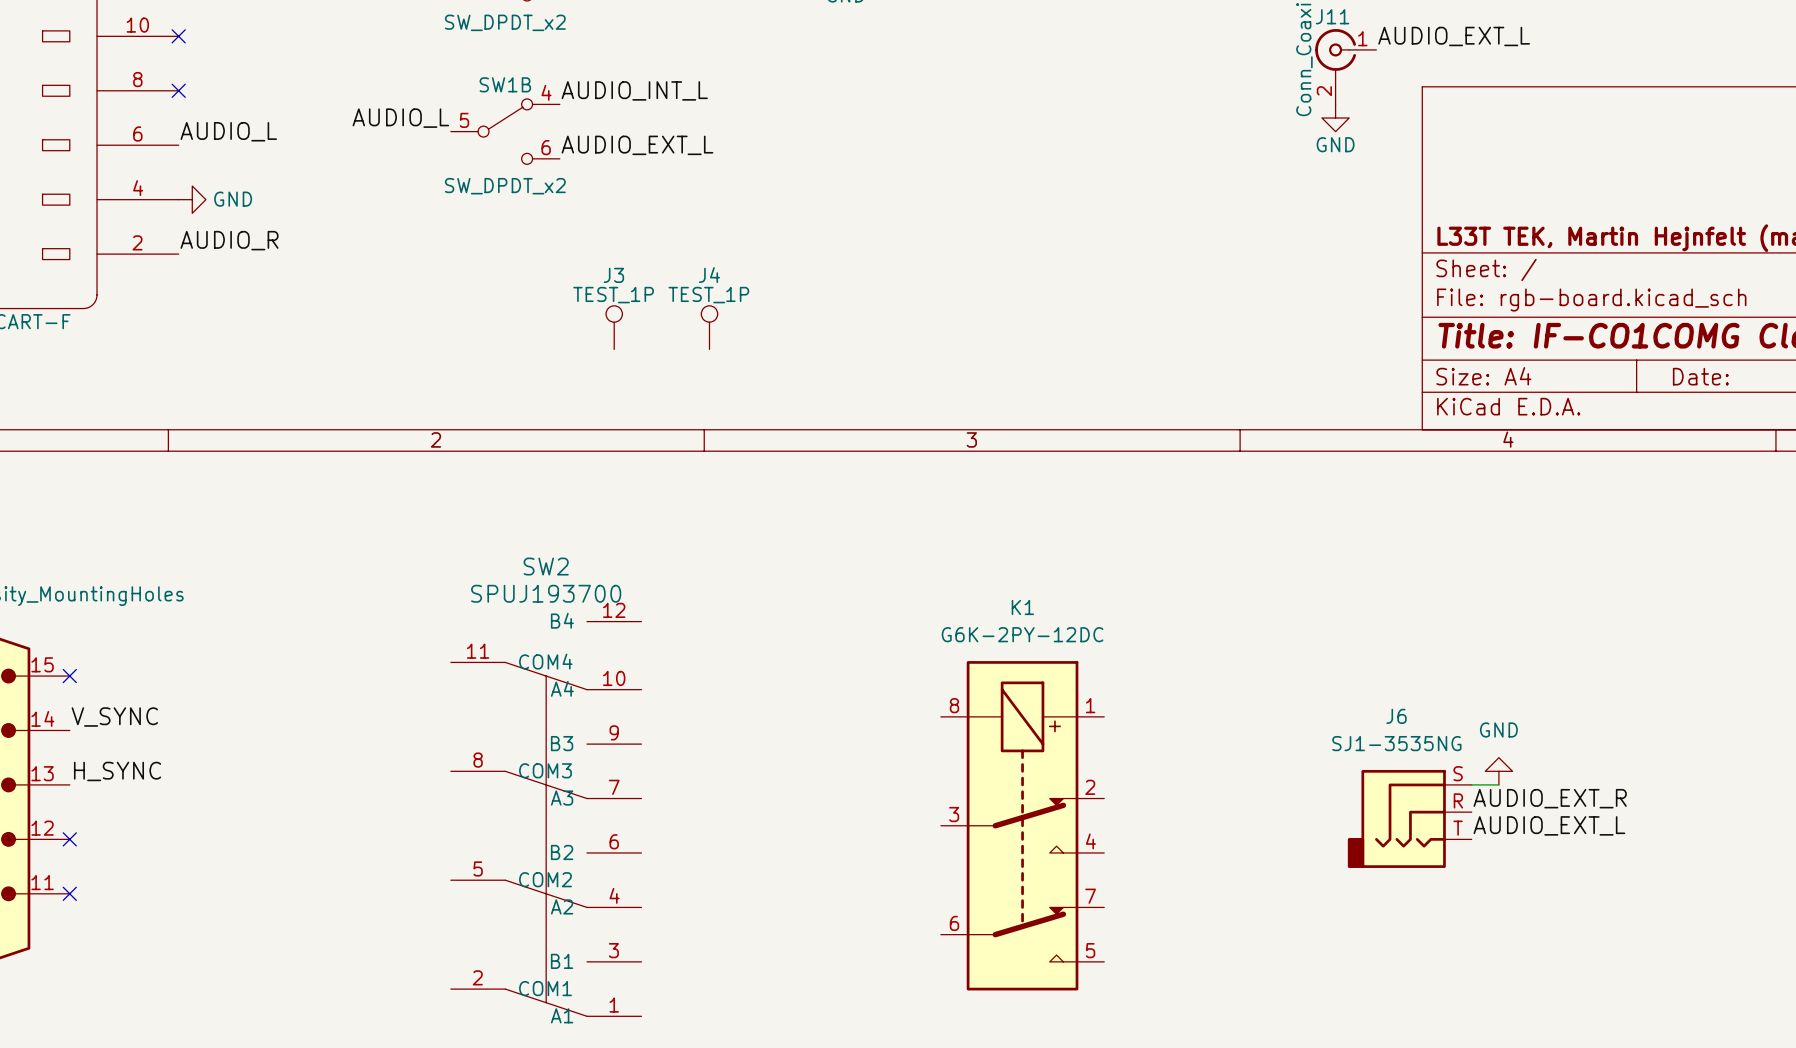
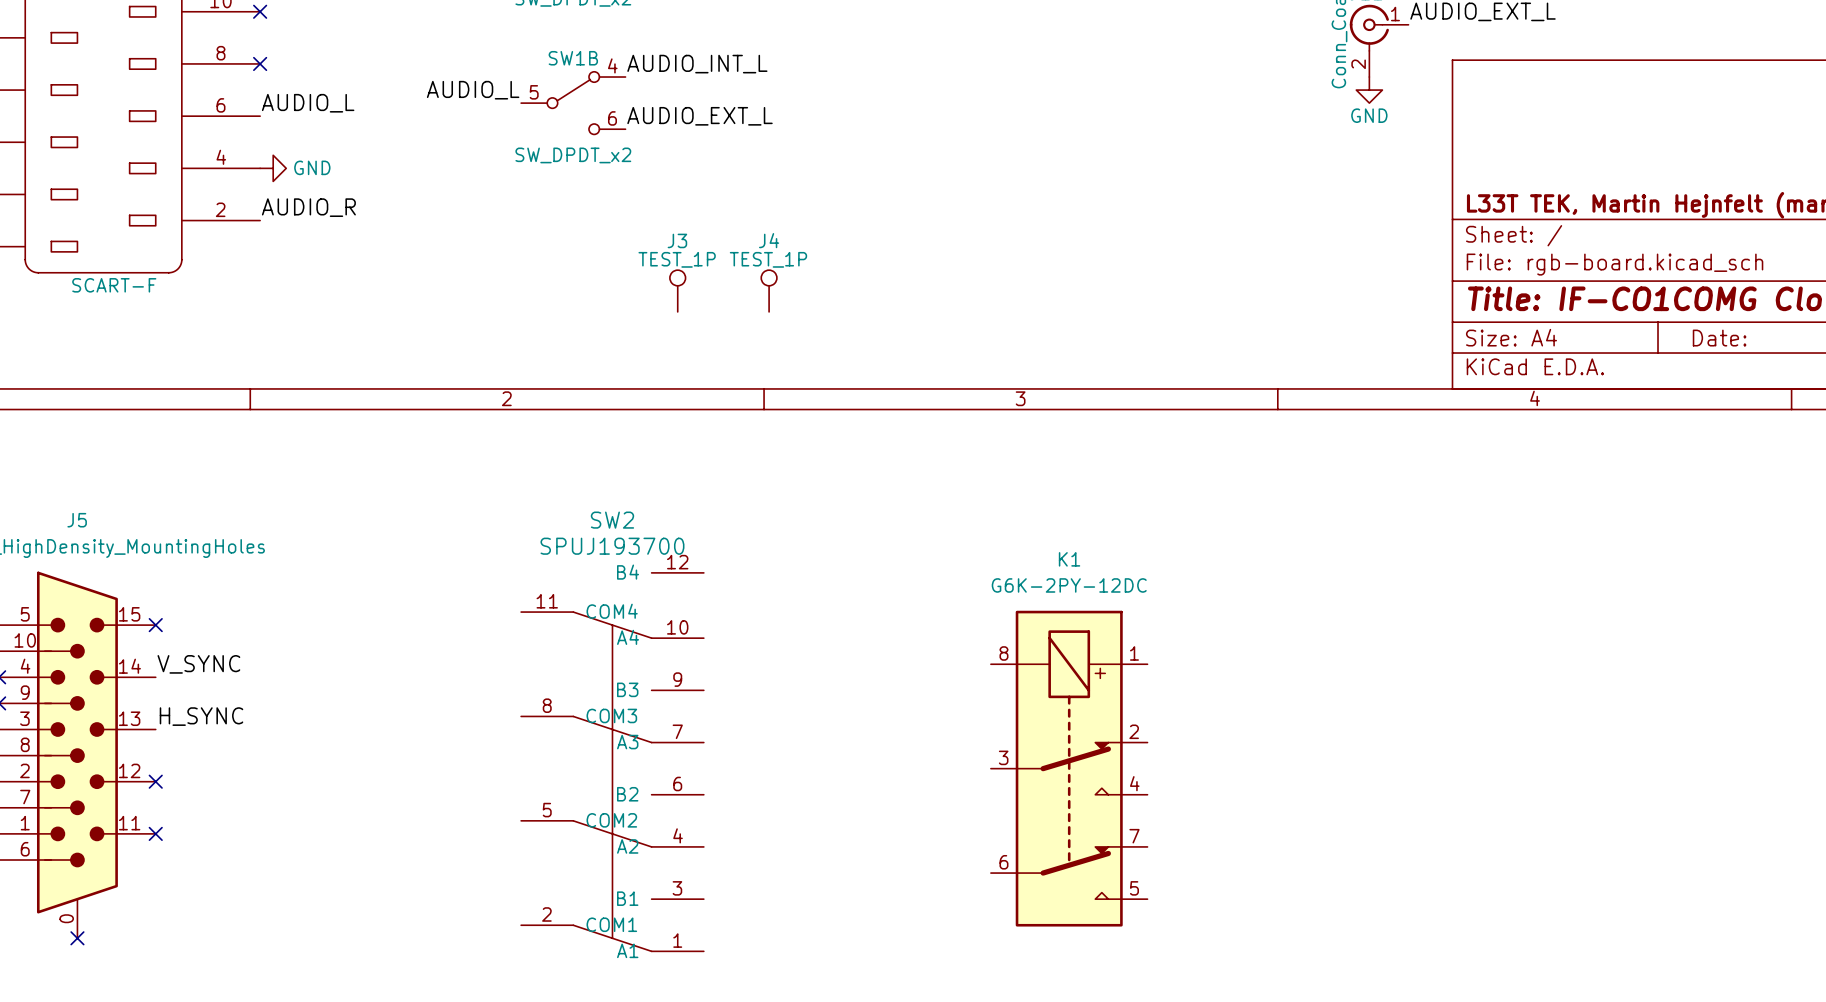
power symbol: GND (1498, 771) -> none
wire: (1471, 784) (1498, 784) -> none
label: AUDIO_EXT_R (1550, 798) -> none
J6: SJ1-3535NG (1409, 818) -> none
label: AUDIO_EXT_L (1549, 825) -> none

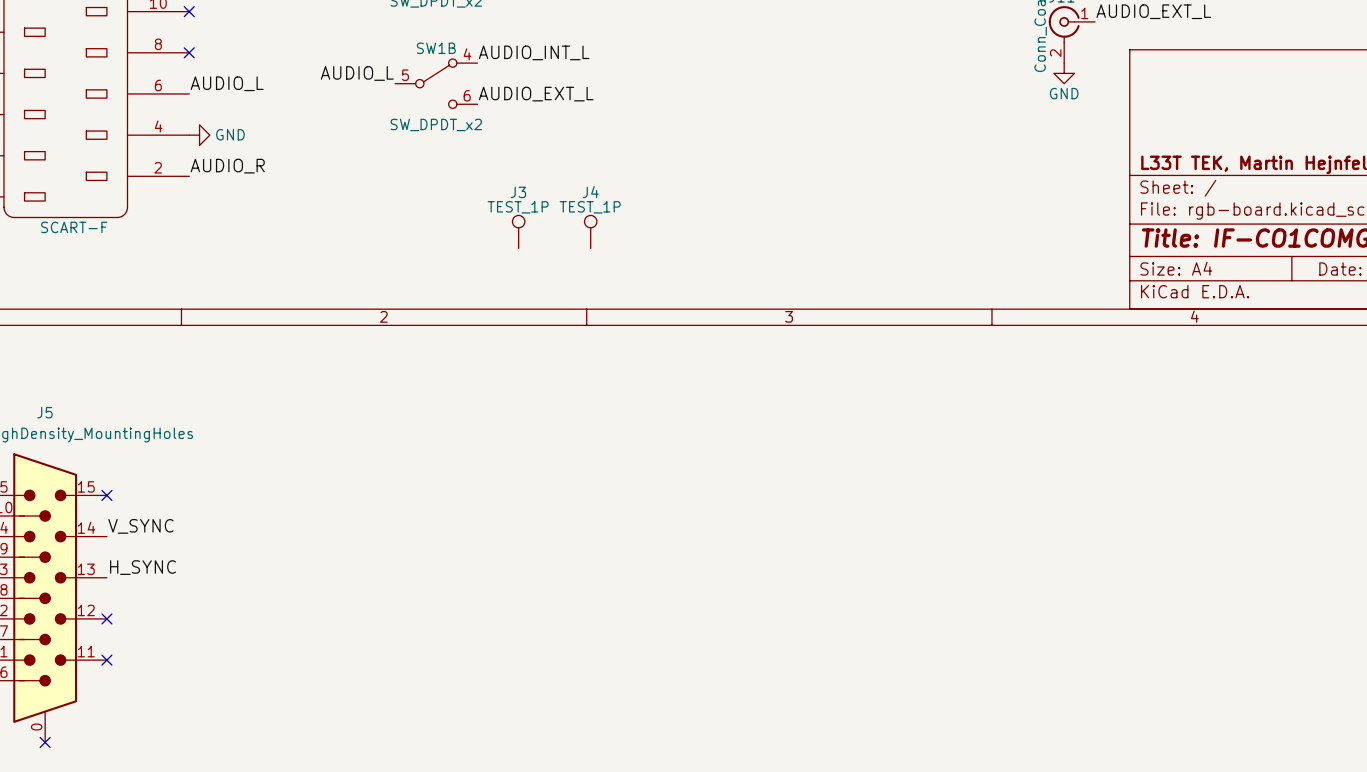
SW2: SPUJ193700 (612, 762) -> none
K1: G6K-2PY-12DC (1069, 768) -> none

